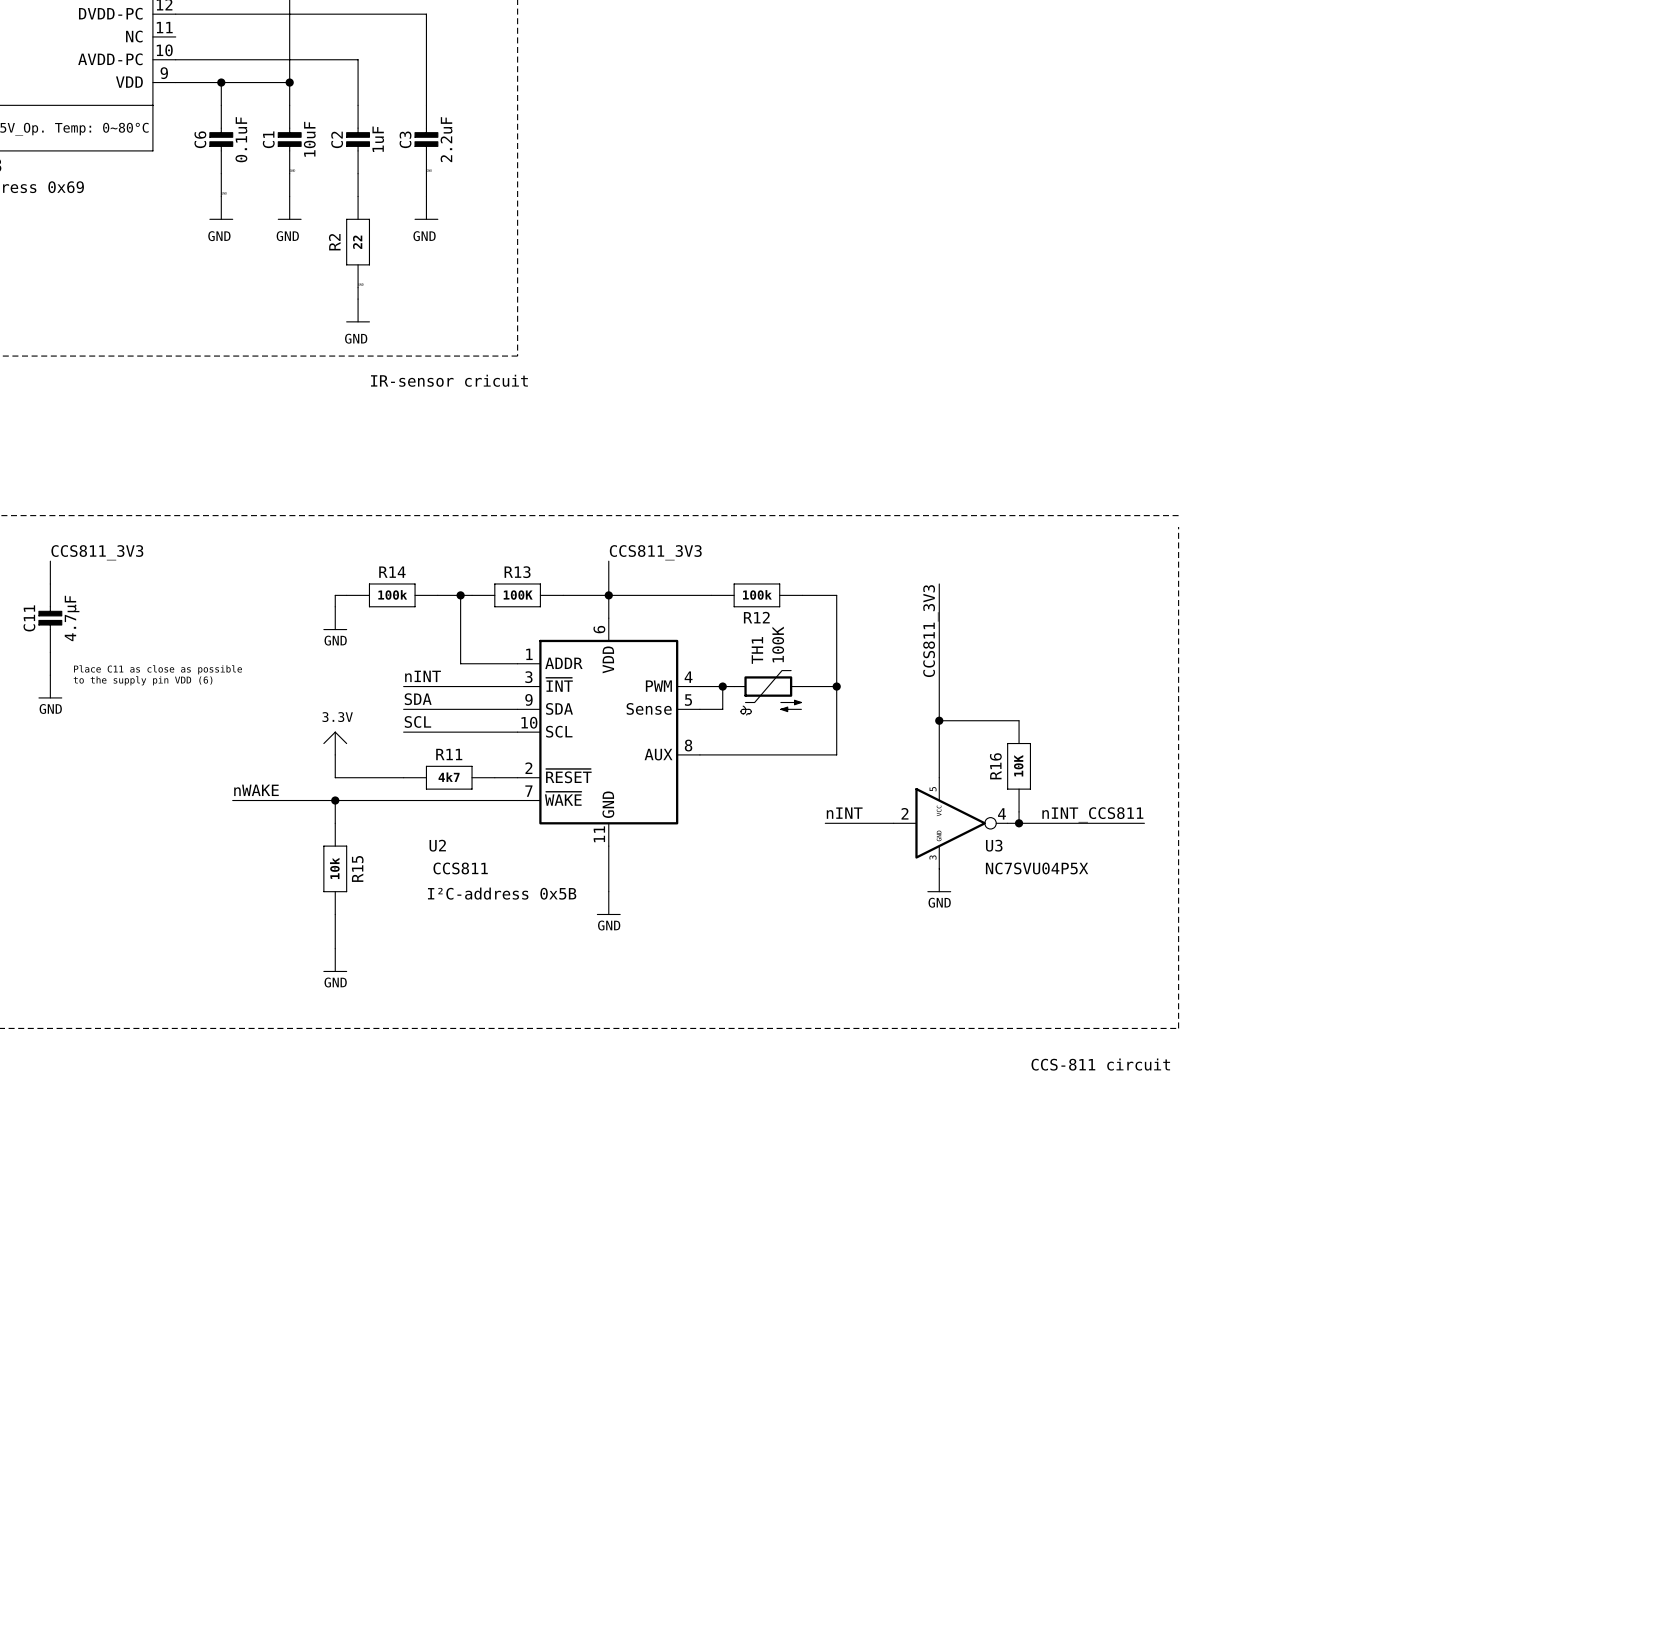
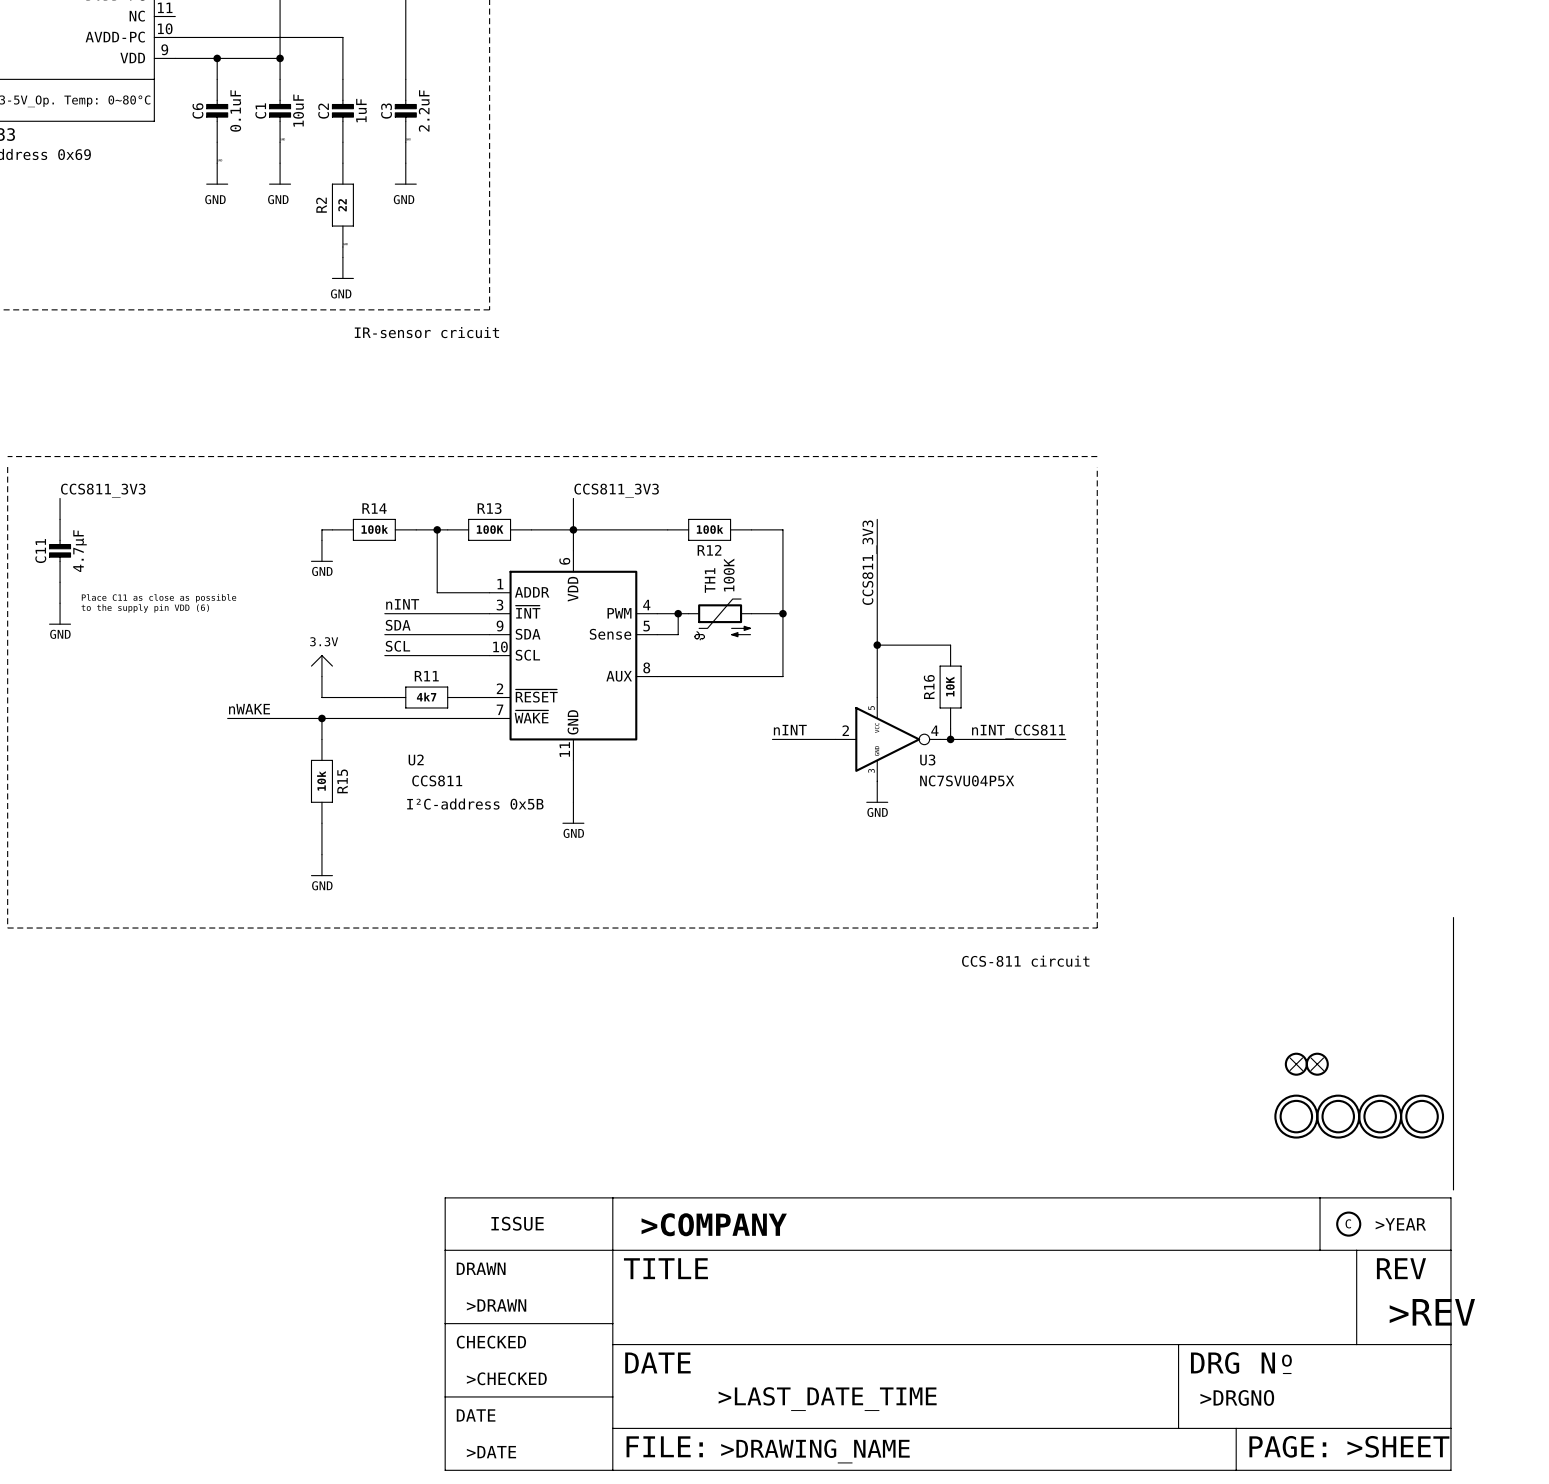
power symbol: none -> (1453, 1053)
part: none -> (1296, 1064)
part: none -> (1317, 1064)
part: none -> (1296, 1116)
part: none -> (1338, 1116)
part: none -> (1380, 1116)
part: none -> (1422, 1116)
power symbol: none -> (948, 1334)

